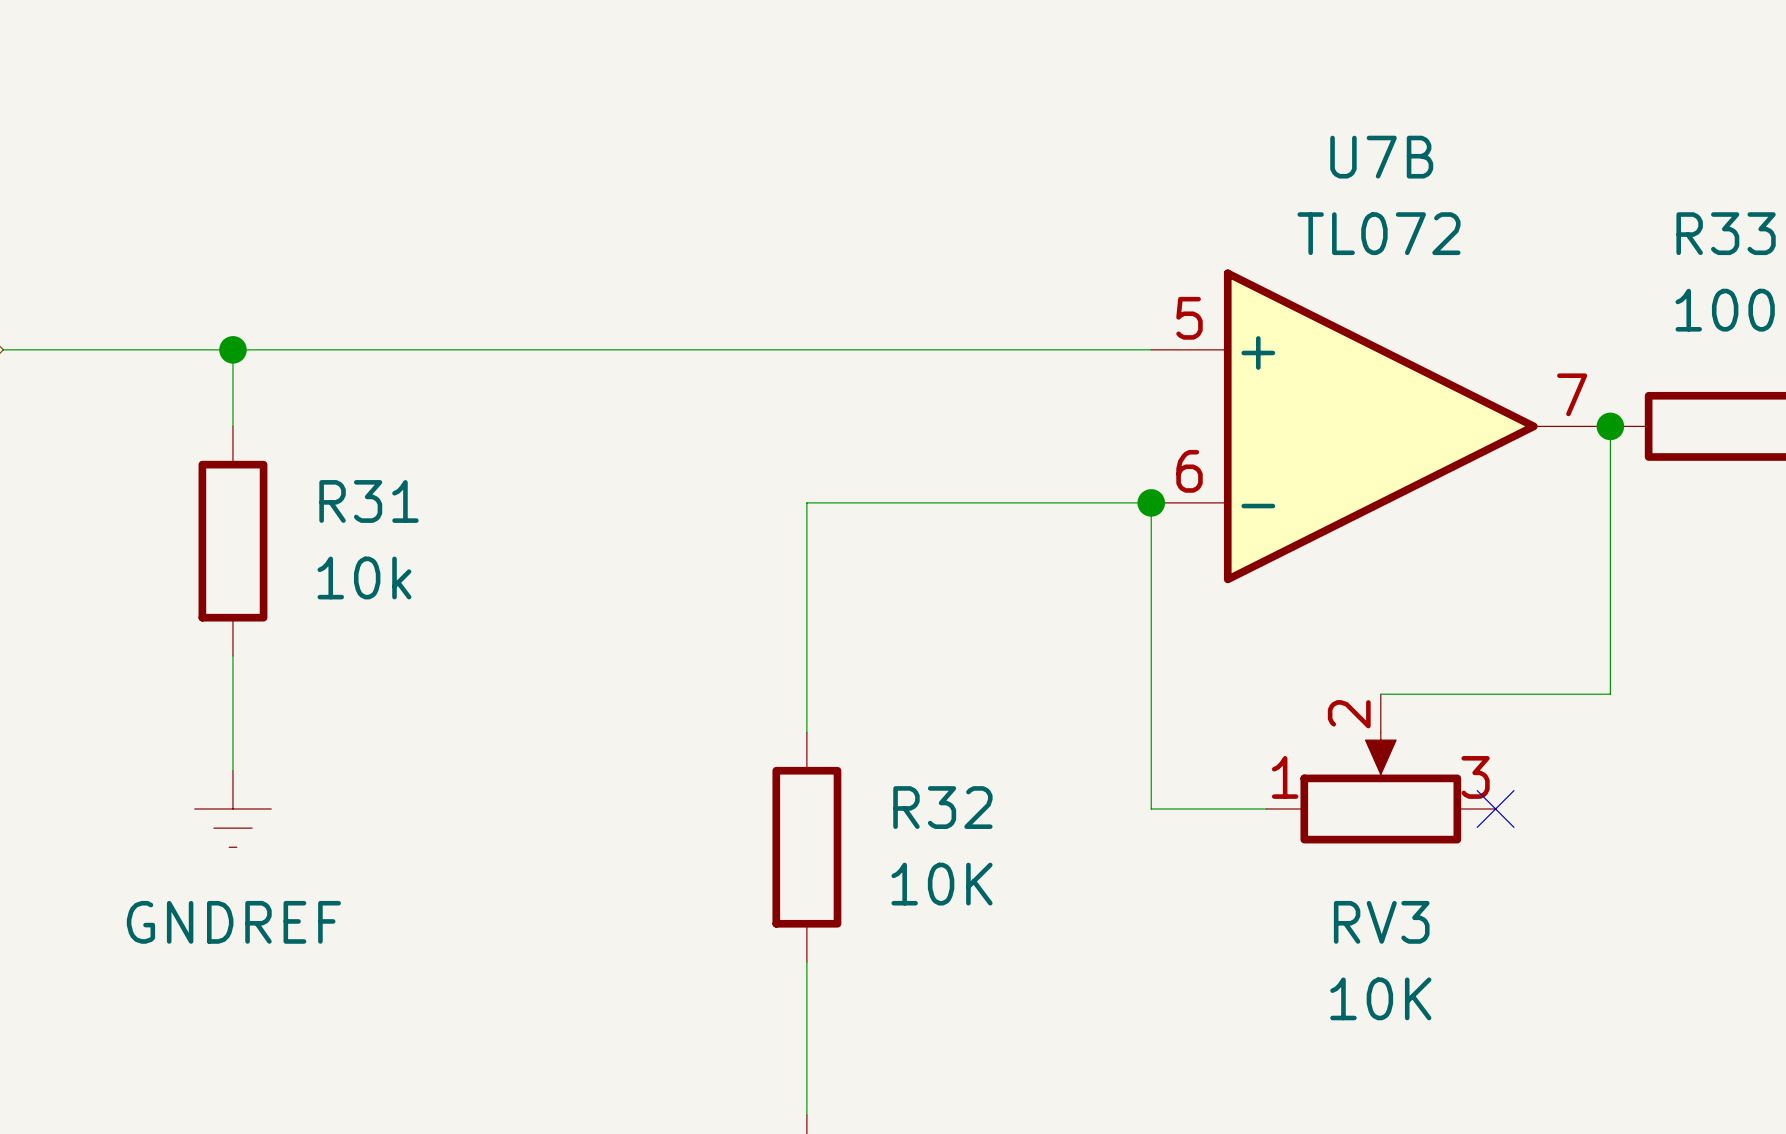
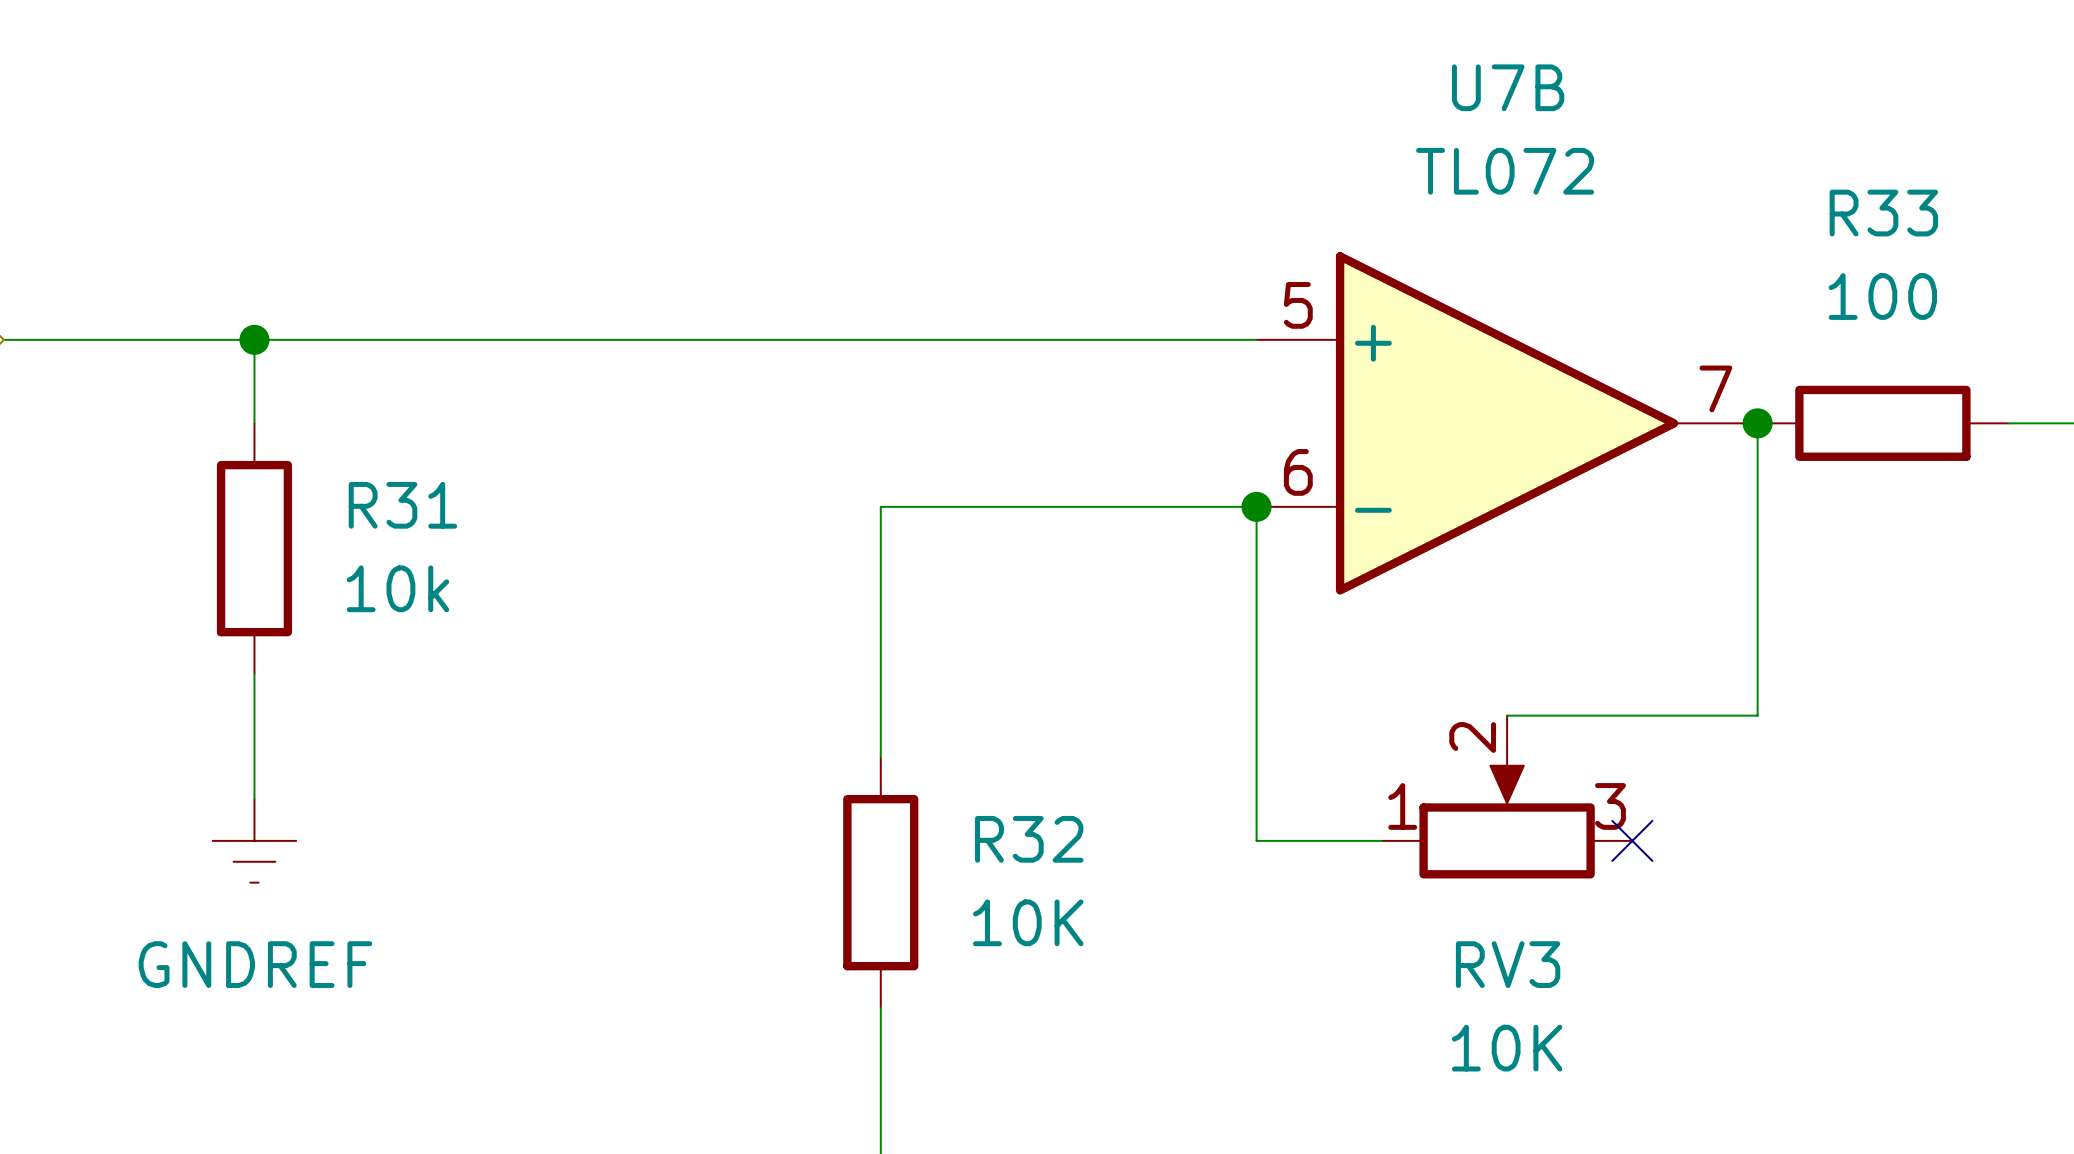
U7B name position: U7B (1381, 157) -> U7B (1508, 87)
U7B value position: TL072 (1378, 233) -> TL072 (1505, 171)

